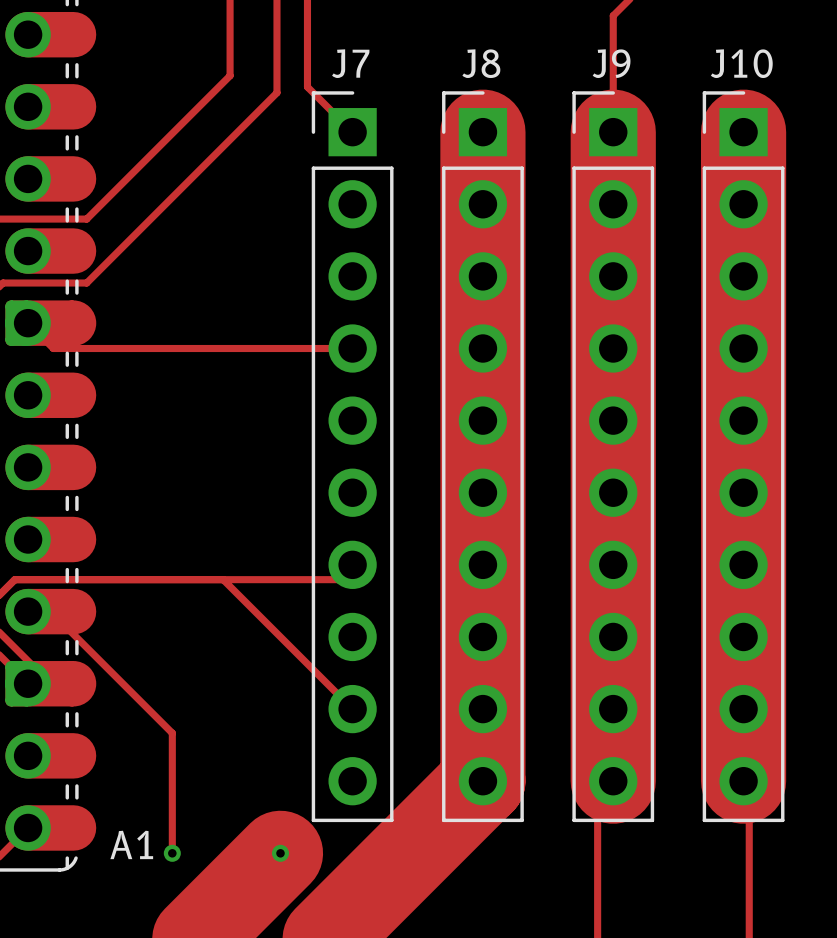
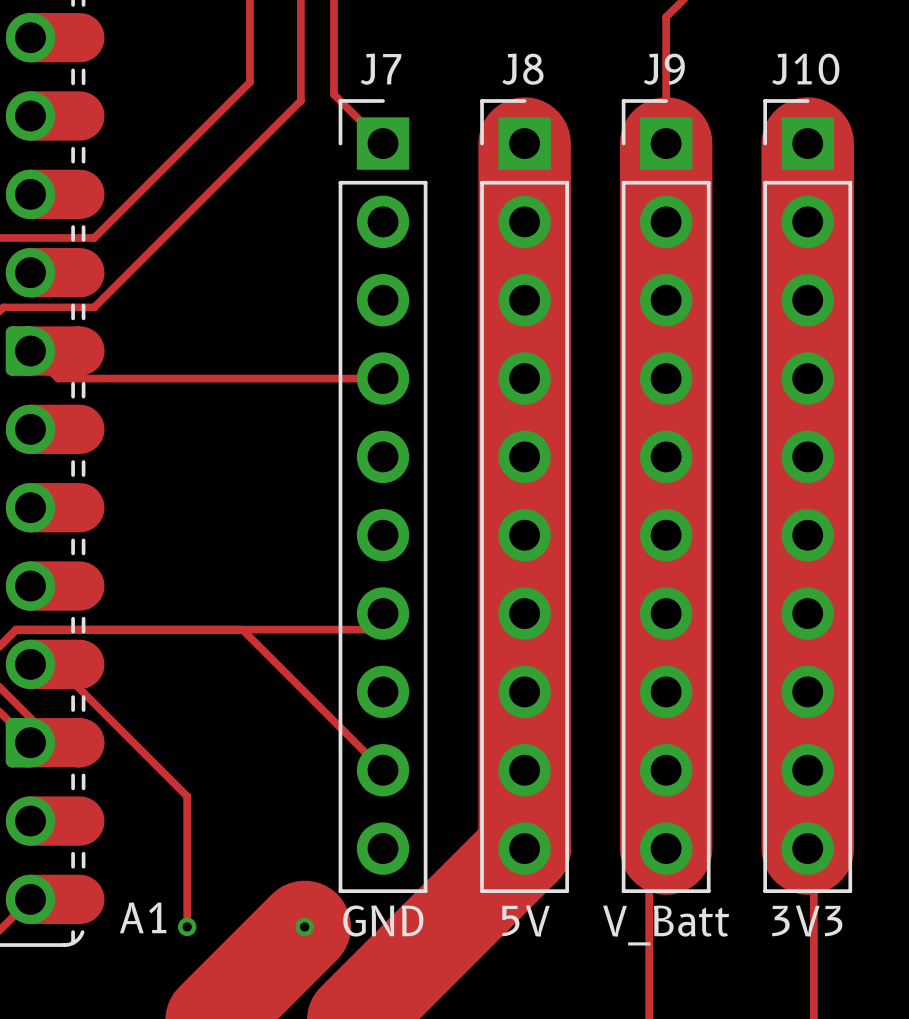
J7 value: none -> GND (383, 921)
J8 value: none -> 5V (526, 921)
J10 value: none -> 3V3 (807, 921)
J9 value: none -> V_Batt (666, 925)

